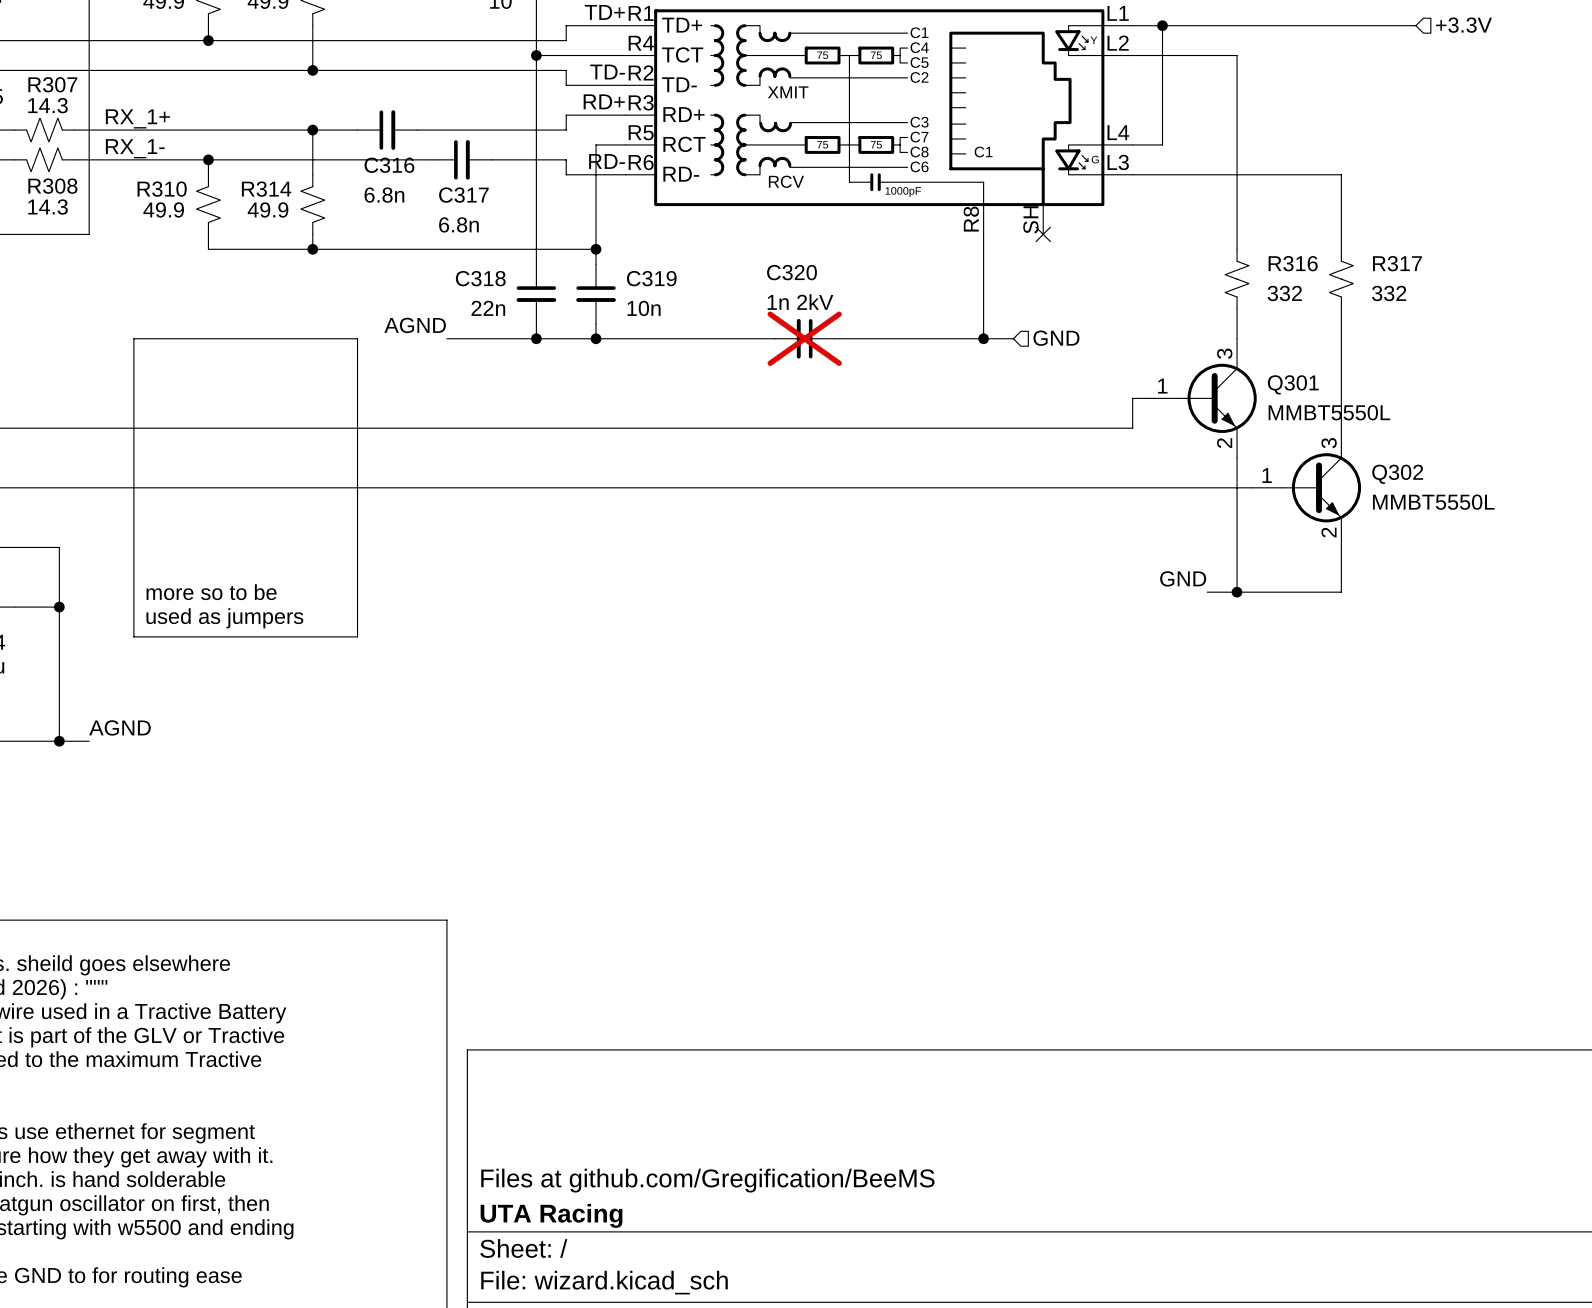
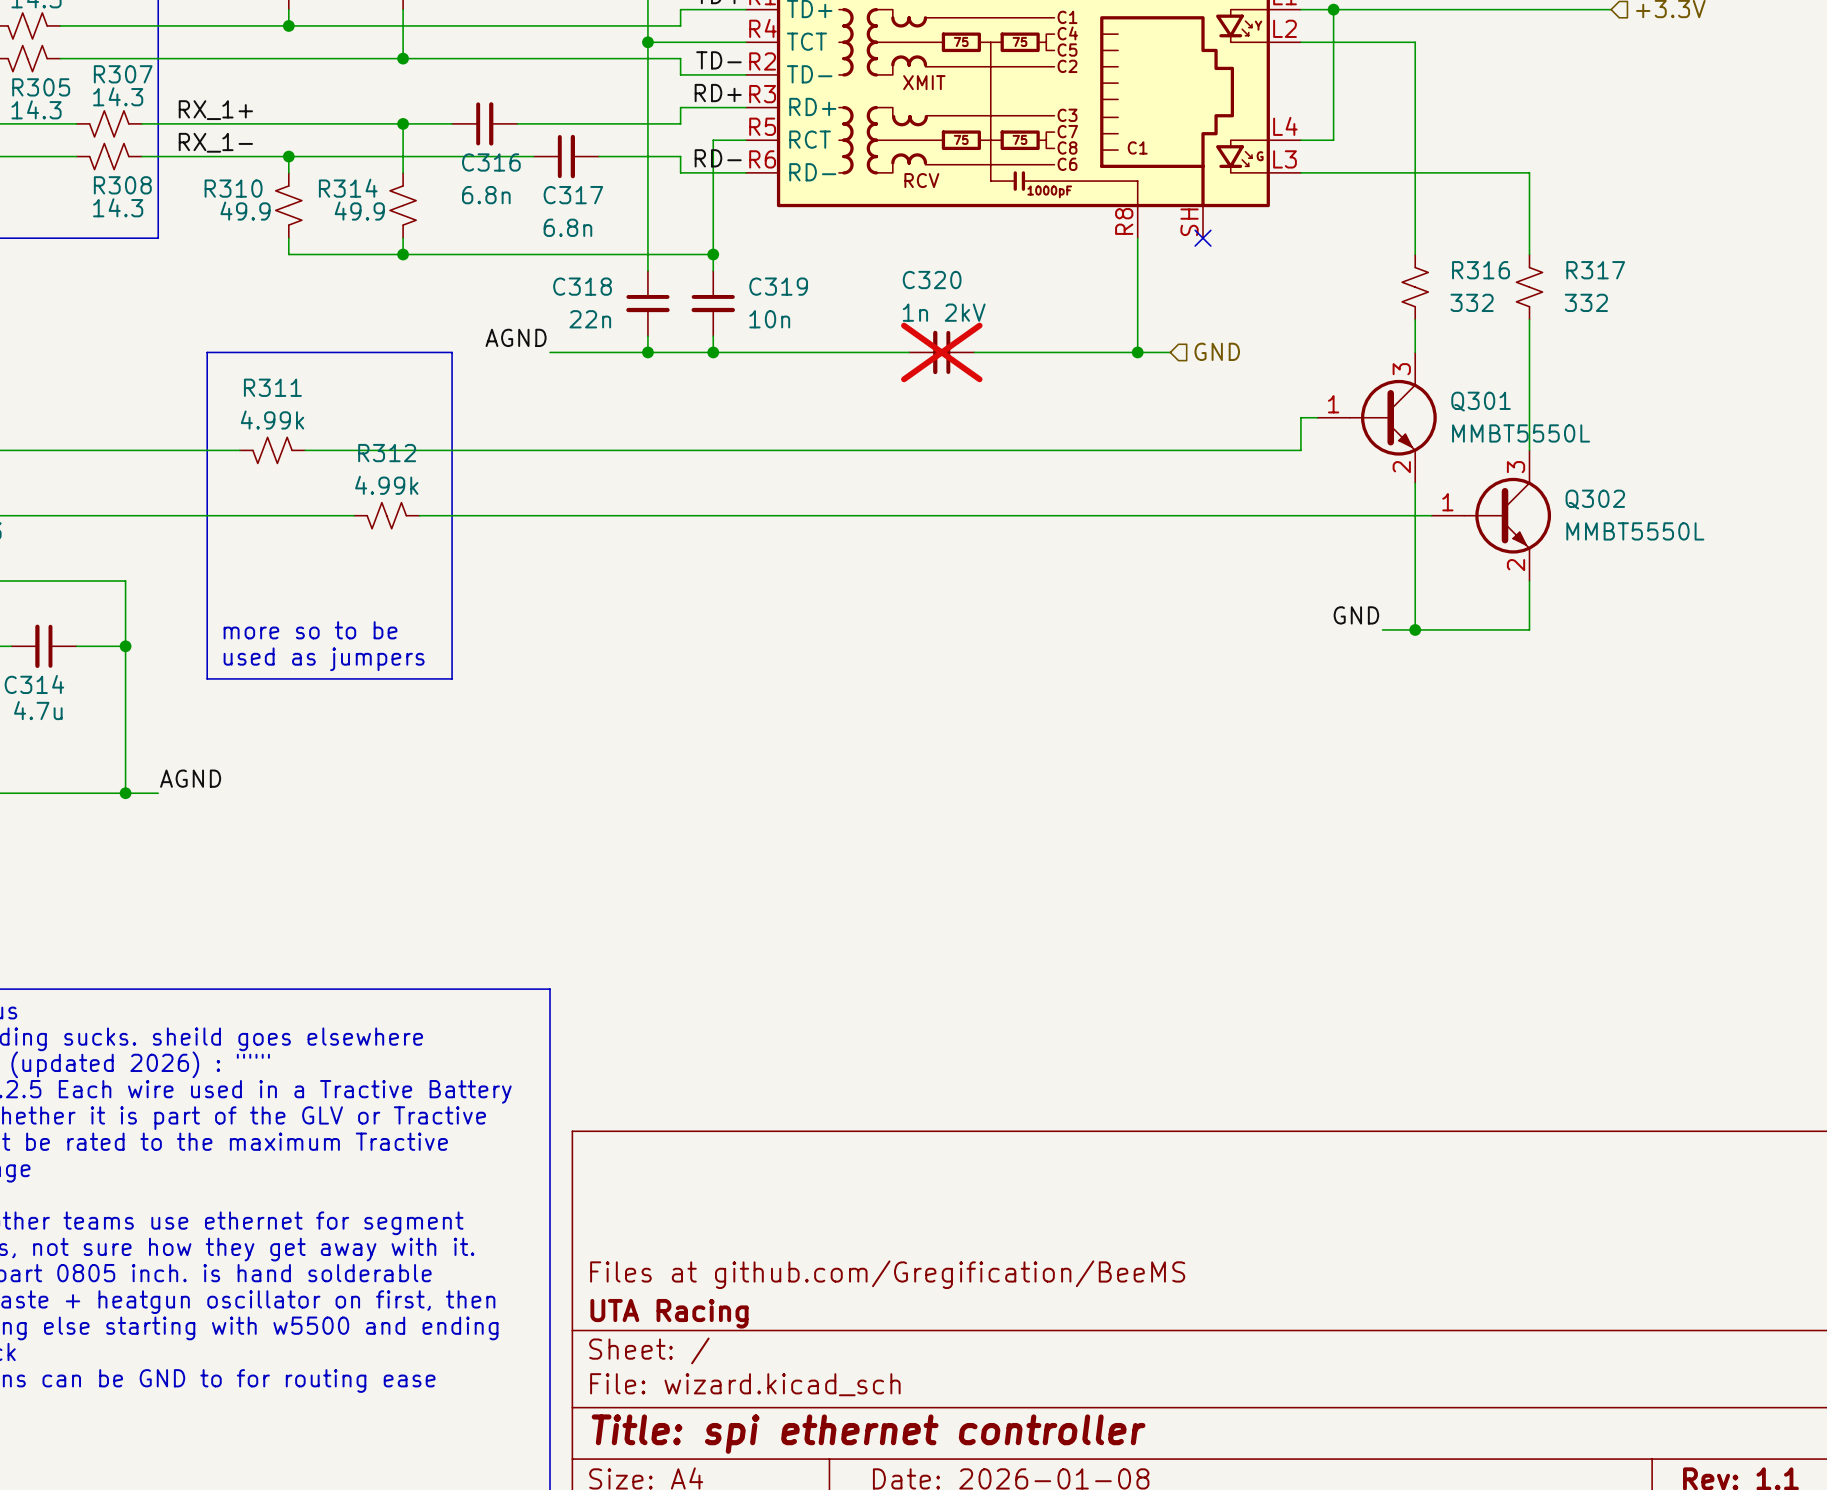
wire: (163, 428) (223, 428) -> none
R311: none -> 4.99k (272, 450)
wire: (268, 487) (327, 487) -> none
R312: none -> 4.99k (386, 515)

